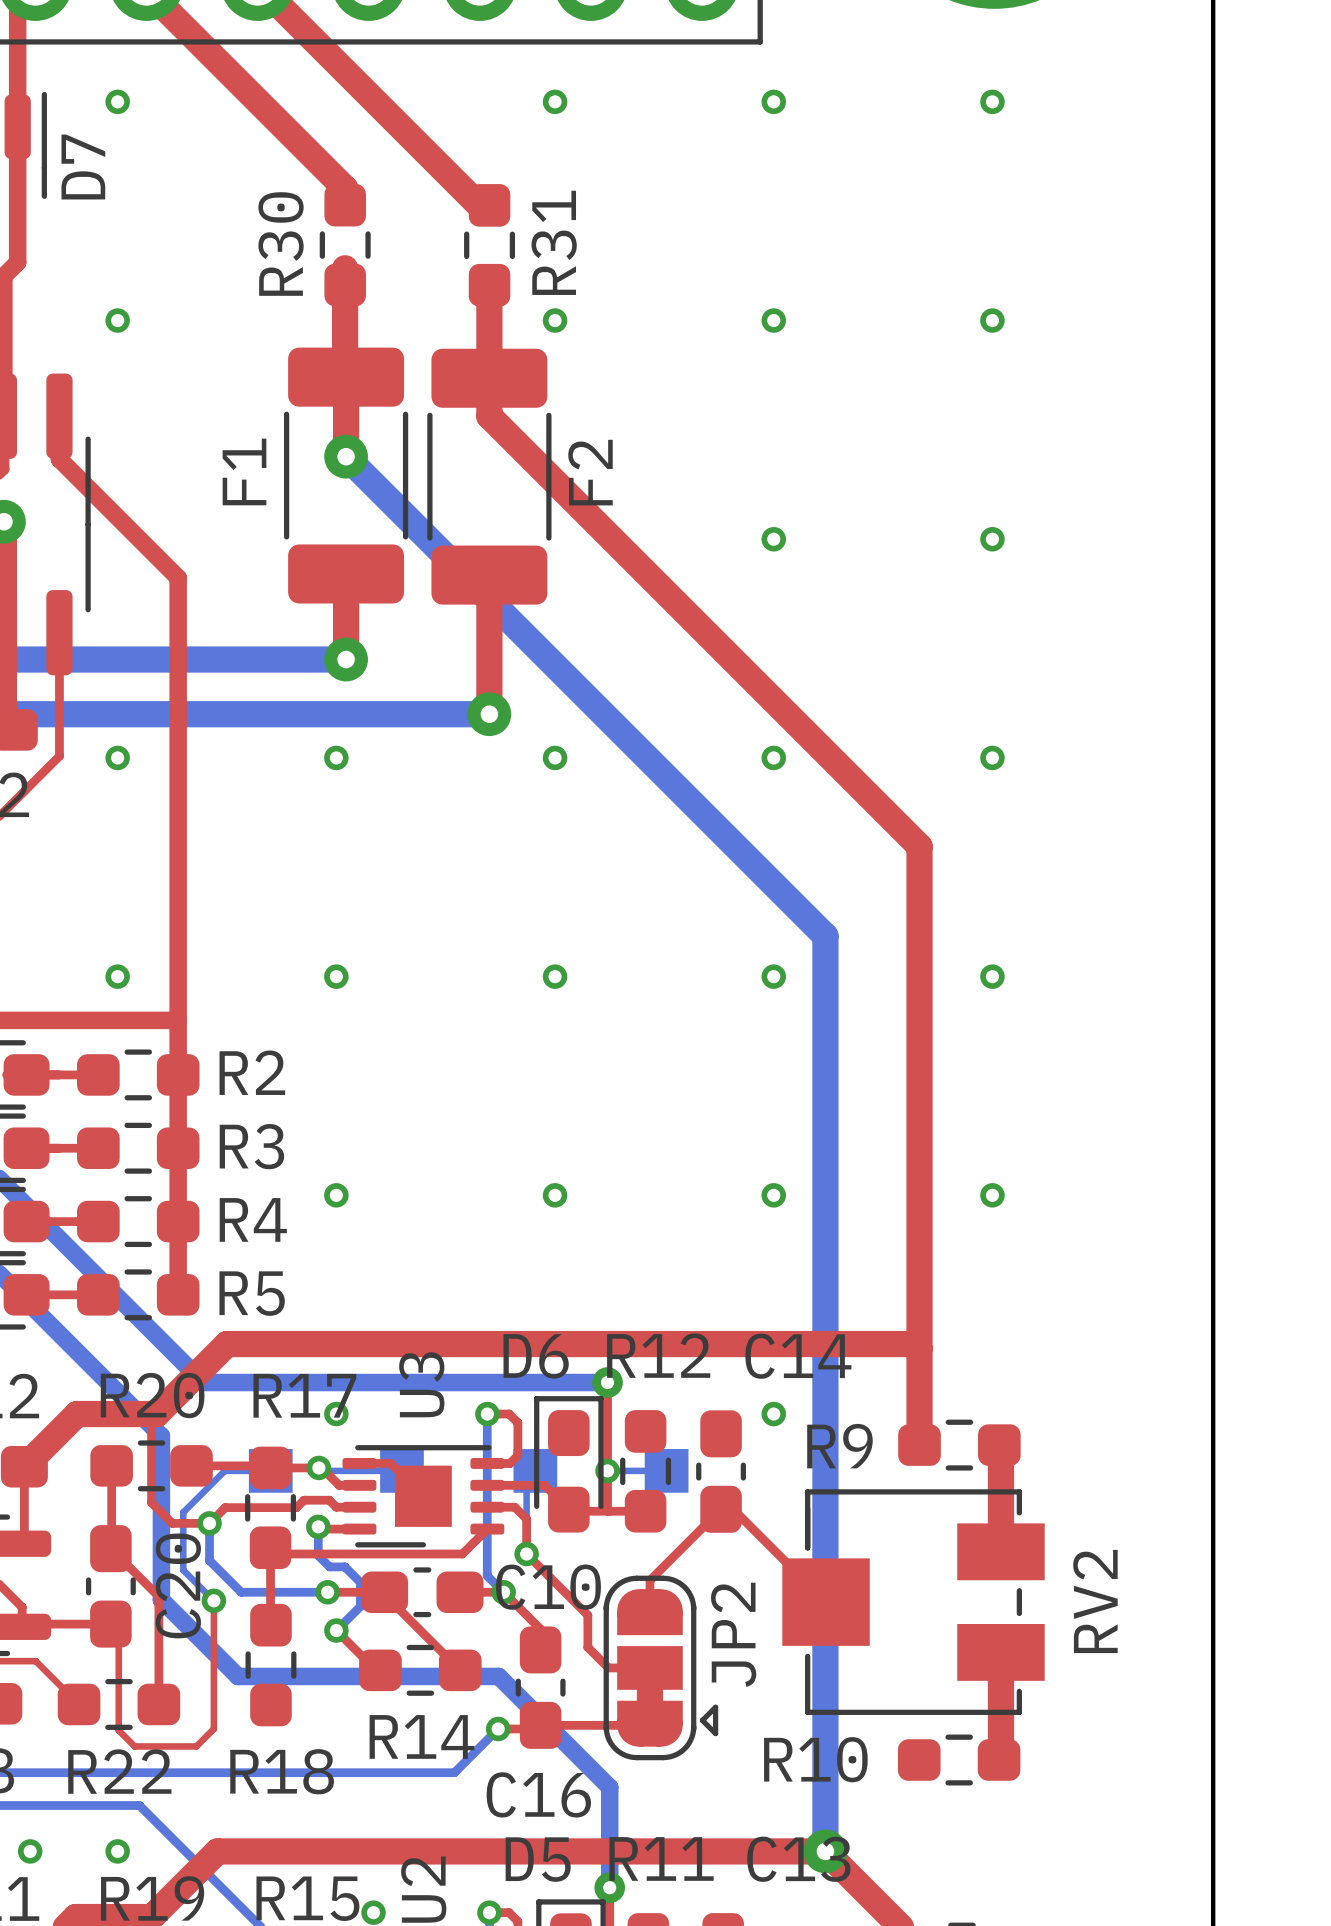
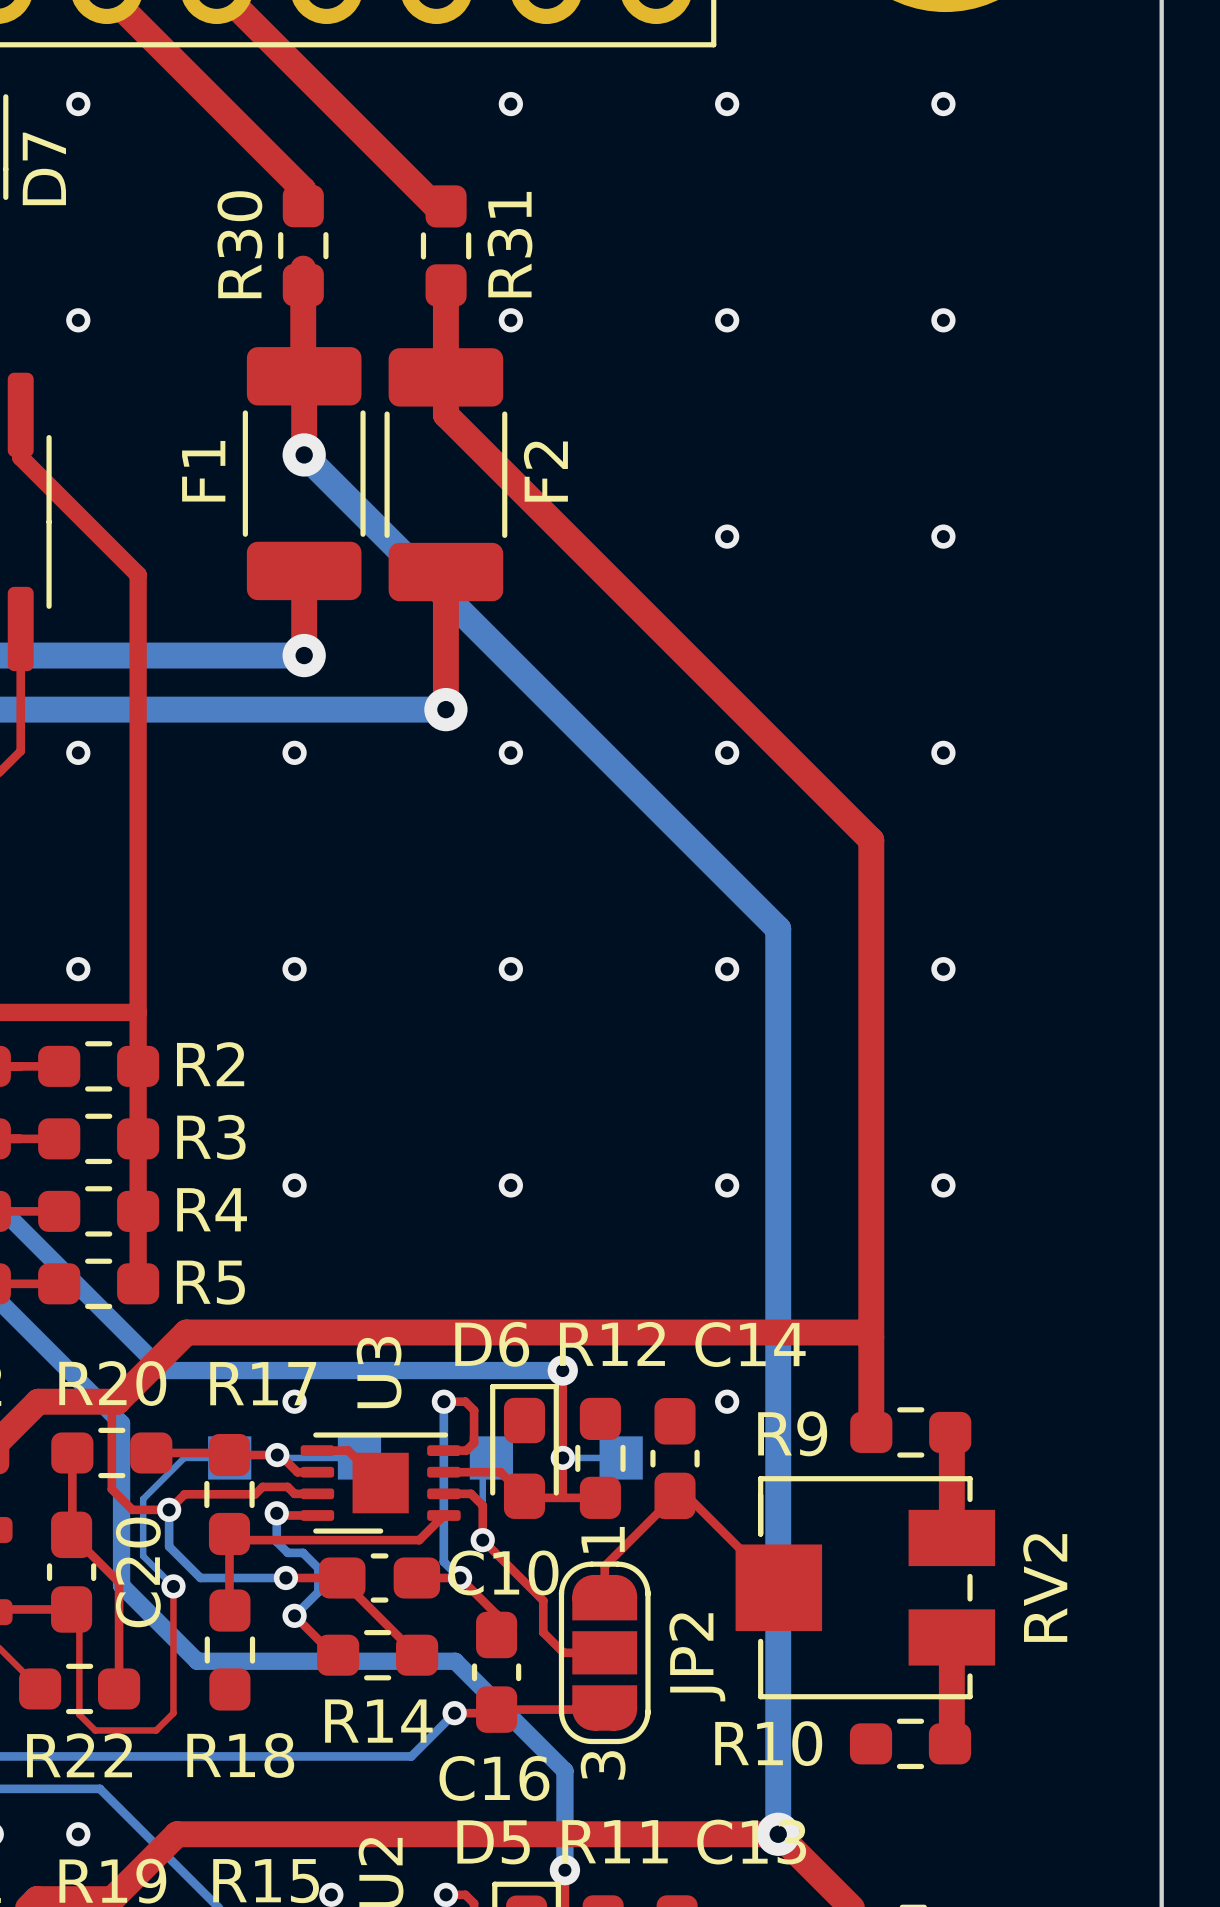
JP2 footprint: [603, 1575, 719, 1761] -> [558, 1561, 651, 1745]

